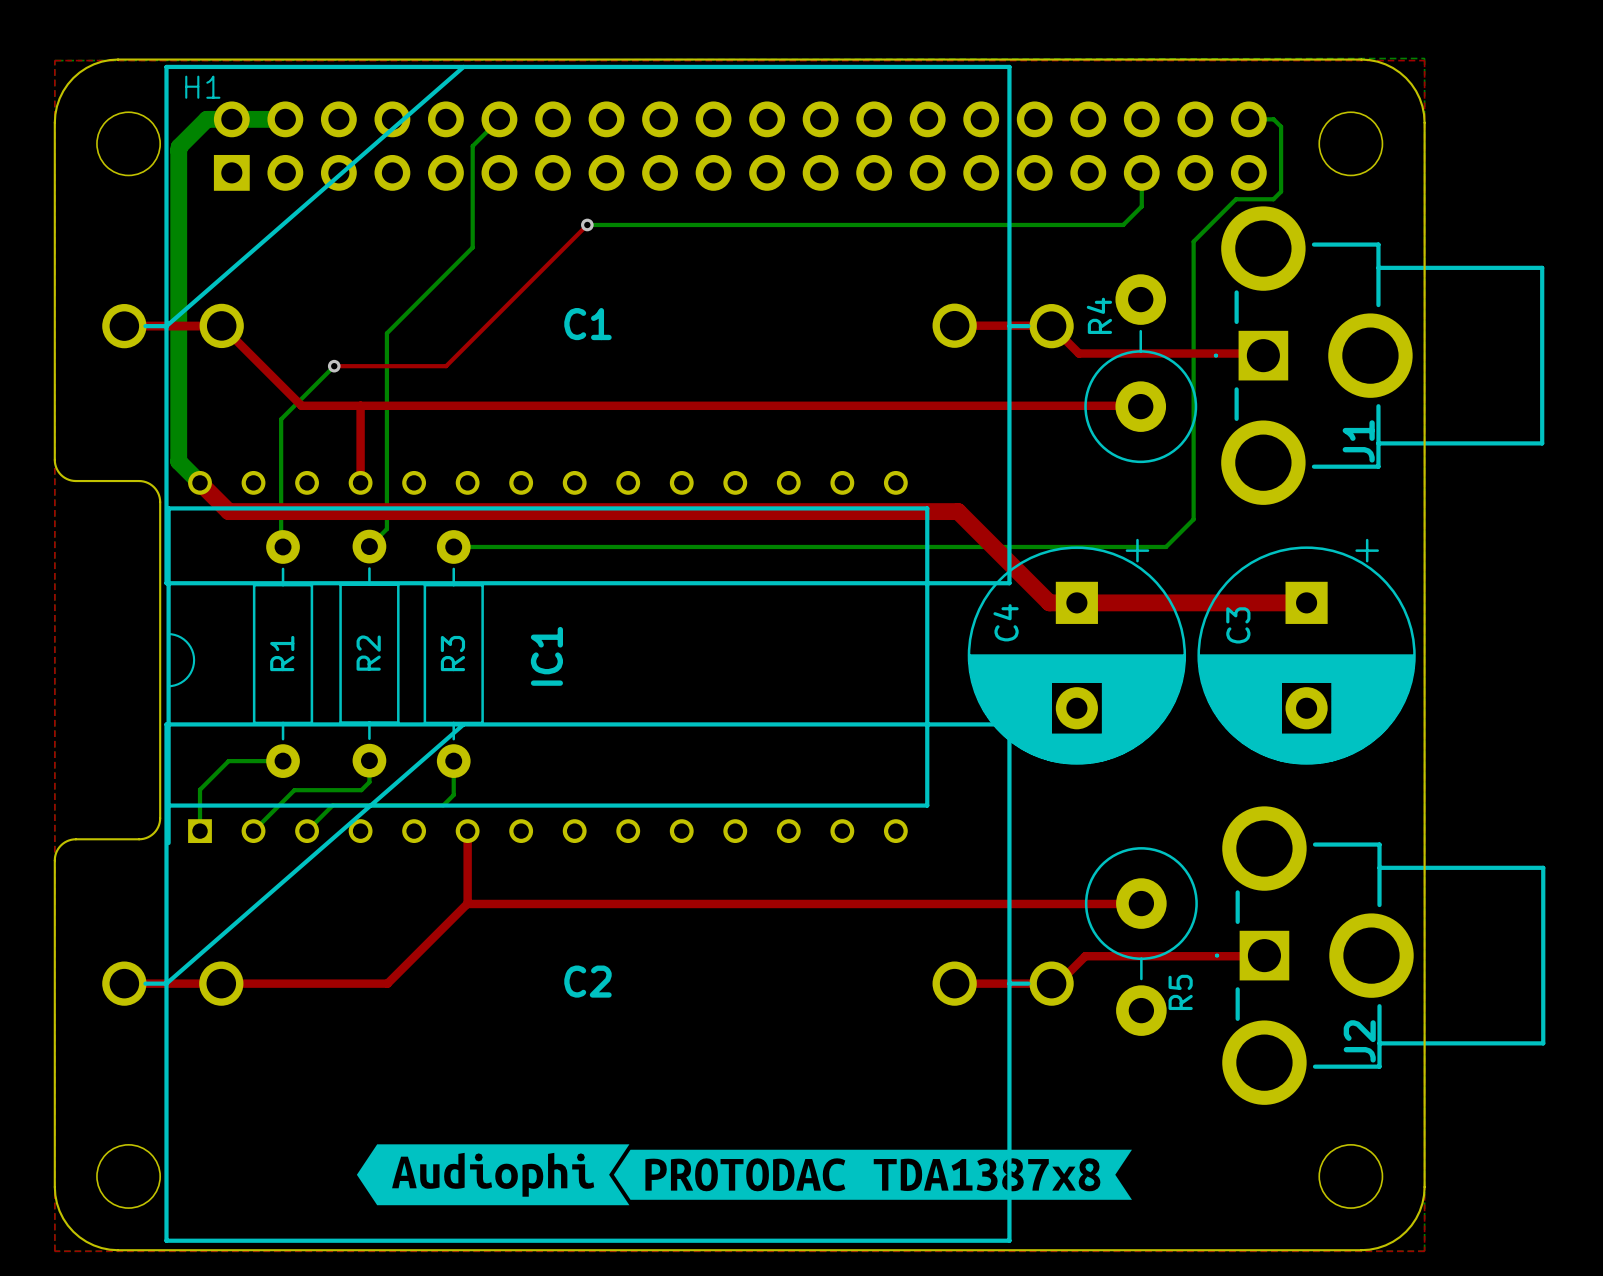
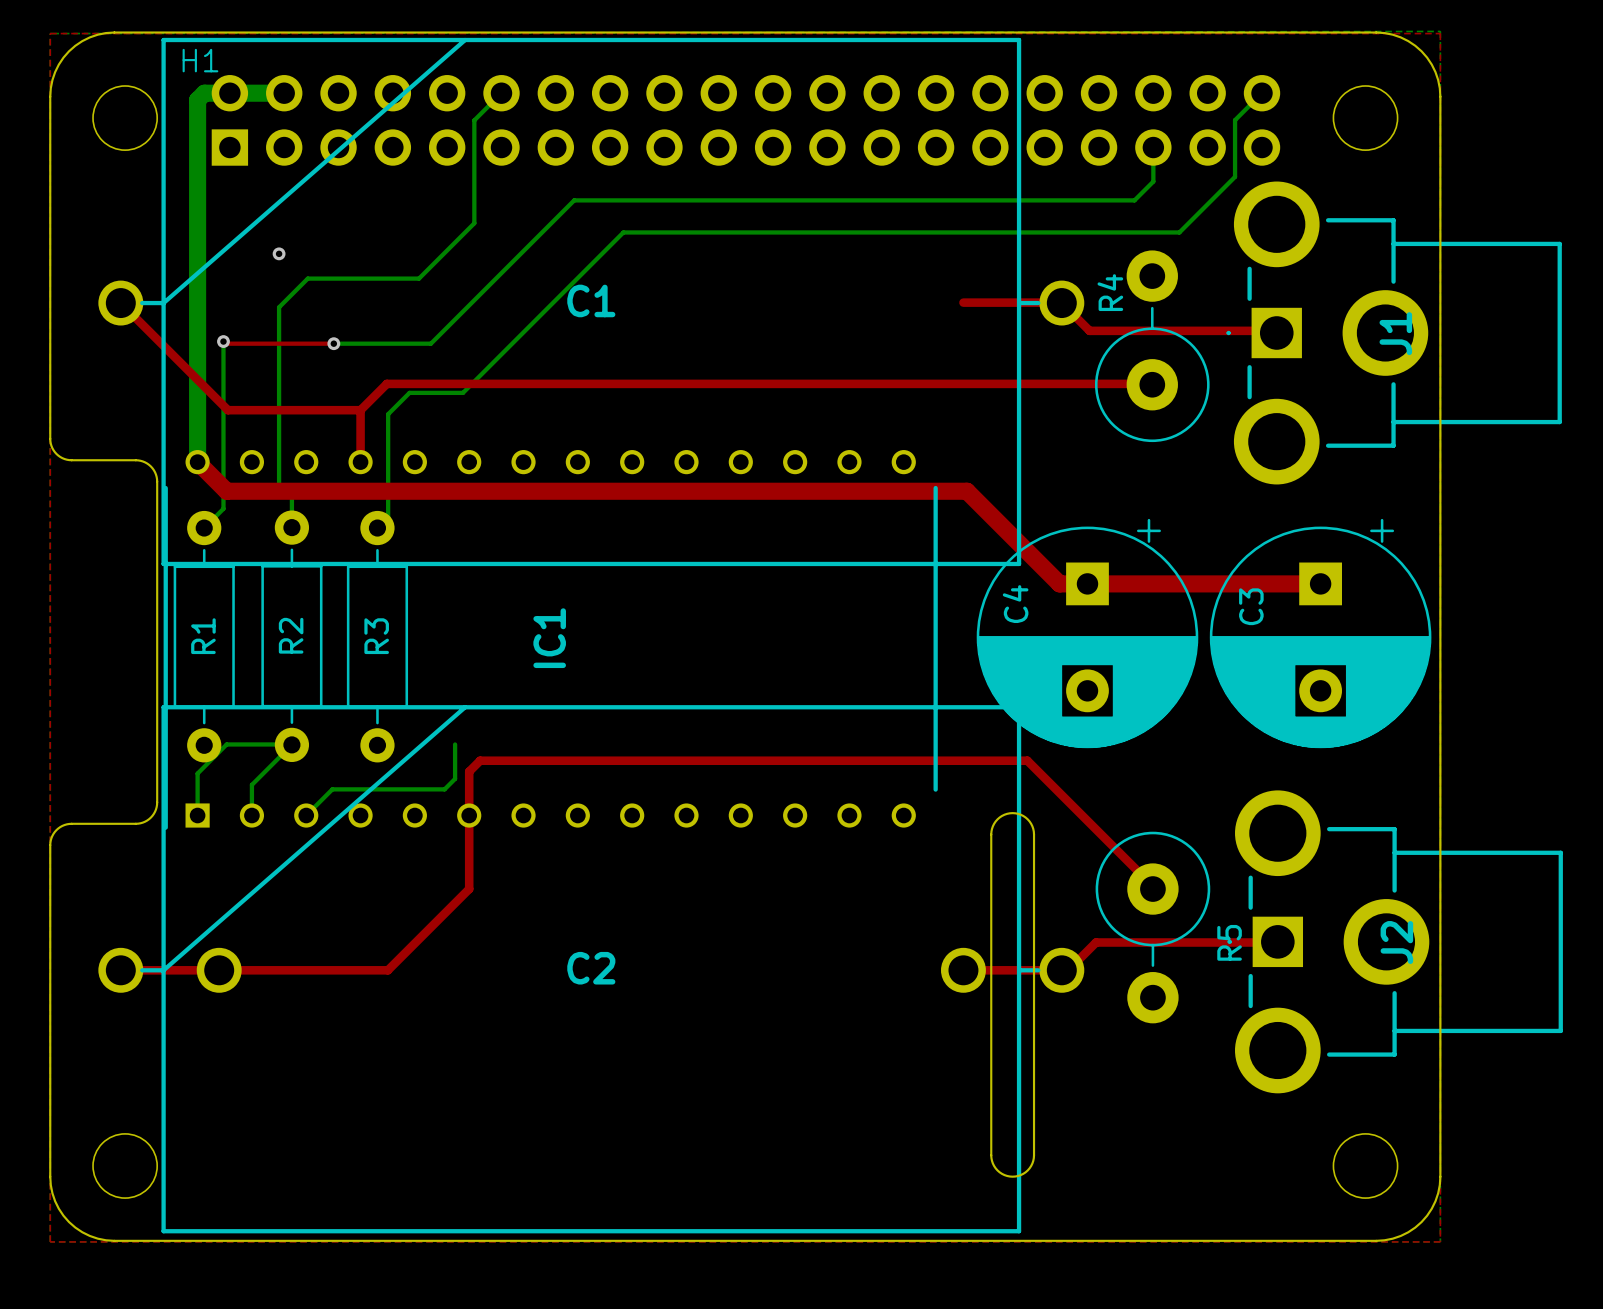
H1 footprint: [53, 58, 1426, 1252] -> [49, 31, 1442, 1242]
bottom track: (1248, 119) (1273, 119) (1281, 126) (1281, 191) (1273, 199) (1235, 199) (1193, 241) (1193, 519) (1166, 546) (453, 546) -> (1262, 93) (1235, 120) (1235, 176) (1179, 232) (623, 232) (463, 392) (409, 392) (388, 414) (388, 517) (377, 528)
bottom track: (200, 126) (179, 146) (178, 150) (178, 461) (200, 482) -> (197, 100) (197, 462)
top track: (587, 224) (446, 366) (334, 366) -> none
bottom track: none -> (590, 200) (574, 200) (430, 343) (332, 343)
via: (587, 224) -> none
via: none -> (279, 253)
bottom track: (418, 302) (386, 333) (386, 529) (369, 546) -> (419, 278) (307, 278) (279, 307) (279, 484) (291, 497) (291, 517) (297, 522)
top track: (124, 325) (221, 325) (301, 405) (386, 405) -> (120, 303) (227, 410) (360, 410) (386, 383)
part: (221, 325) -> none
part: (954, 325) -> none
top track: none -> (223, 341) (225, 343) (332, 343)
bottom track: none -> (223, 341) (223, 508) (204, 528)
via: none -> (223, 341)
bottom track: (334, 366) (281, 419) (281, 545) (283, 546) -> none
top track: (360, 405) (360, 431) -> none
J1 name position: J1 (1358, 441) -> J1 (1395, 333)
line: (168, 508) (927, 508) -> none
line: (167, 634) (177, 636) (186, 641) (192, 650) (194, 660) (192, 670) (186, 678) (177, 684) (167, 686) -> none
R2 position: (369, 653) -> (291, 636)
R1 position: (283, 654) -> (204, 636)
R3 position: (453, 654) -> (377, 636)
bottom track: (369, 760) (369, 782) (361, 790) (294, 790) (253, 831) -> (291, 744) (251, 784) (251, 815)
line: (167, 805) (927, 805) -> none
top track: (1141, 903) (467, 903) -> (1152, 889) (1155, 889) (1027, 760) (480, 760) (469, 771) (469, 815)
R5 name position: R5 (1180, 992) -> R5 (1229, 942)
J2 name position: J2 (1359, 1041) -> J2 (1396, 942)
drawing: [356, 1144, 1132, 1206] -> none

